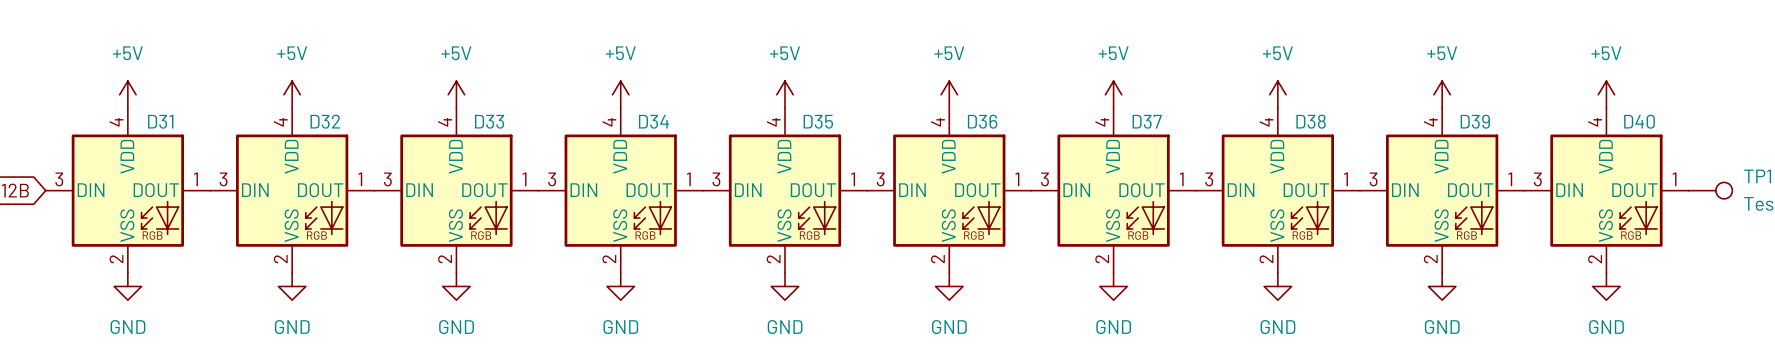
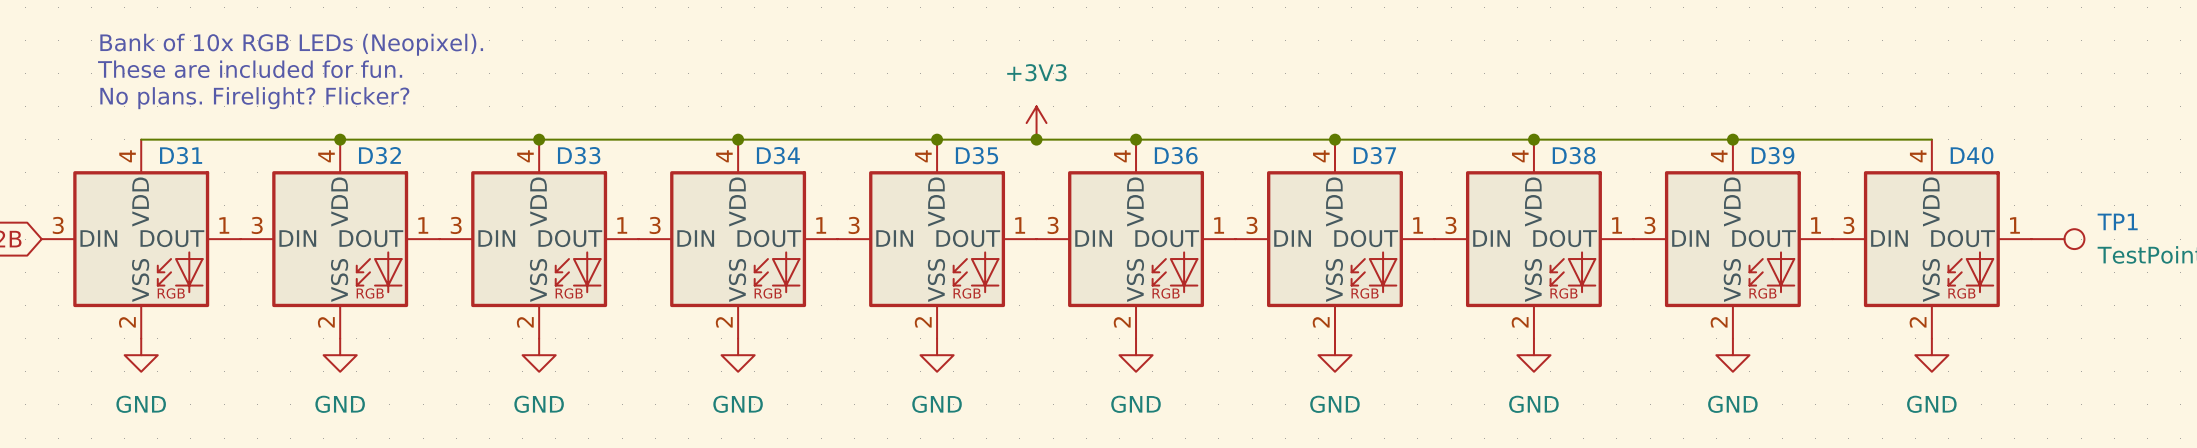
text: none -> Bank of 10x RGB LEDs (Neopixel). (291, 44)
text: none -> These are included for fun. (250, 69)
text: none -> No plans. Firelight? Flicker? (254, 98)
power symbol: +5V (127, 94) -> none
power symbol: +5V (292, 94) -> none
power symbol: +5V (456, 94) -> none
power symbol: +5V (620, 94) -> none
power symbol: +5V (785, 94) -> none
power symbol: none -> +3V3 (1036, 123)
power symbol: +5V (949, 94) -> none
power symbol: +5V (1113, 94) -> none
power symbol: +5V (1277, 94) -> none
power symbol: +5V (1442, 94) -> none
power symbol: +5V (1606, 94) -> none
wire: none -> (141, 139) (1931, 139)
junction: none -> (340, 139)
junction: none -> (539, 139)
junction: none -> (738, 139)
junction: none -> (937, 139)
junction: none -> (1036, 139)
junction: none -> (1136, 139)
junction: none -> (1334, 139)
junction: none -> (1533, 139)
junction: none -> (1732, 139)

